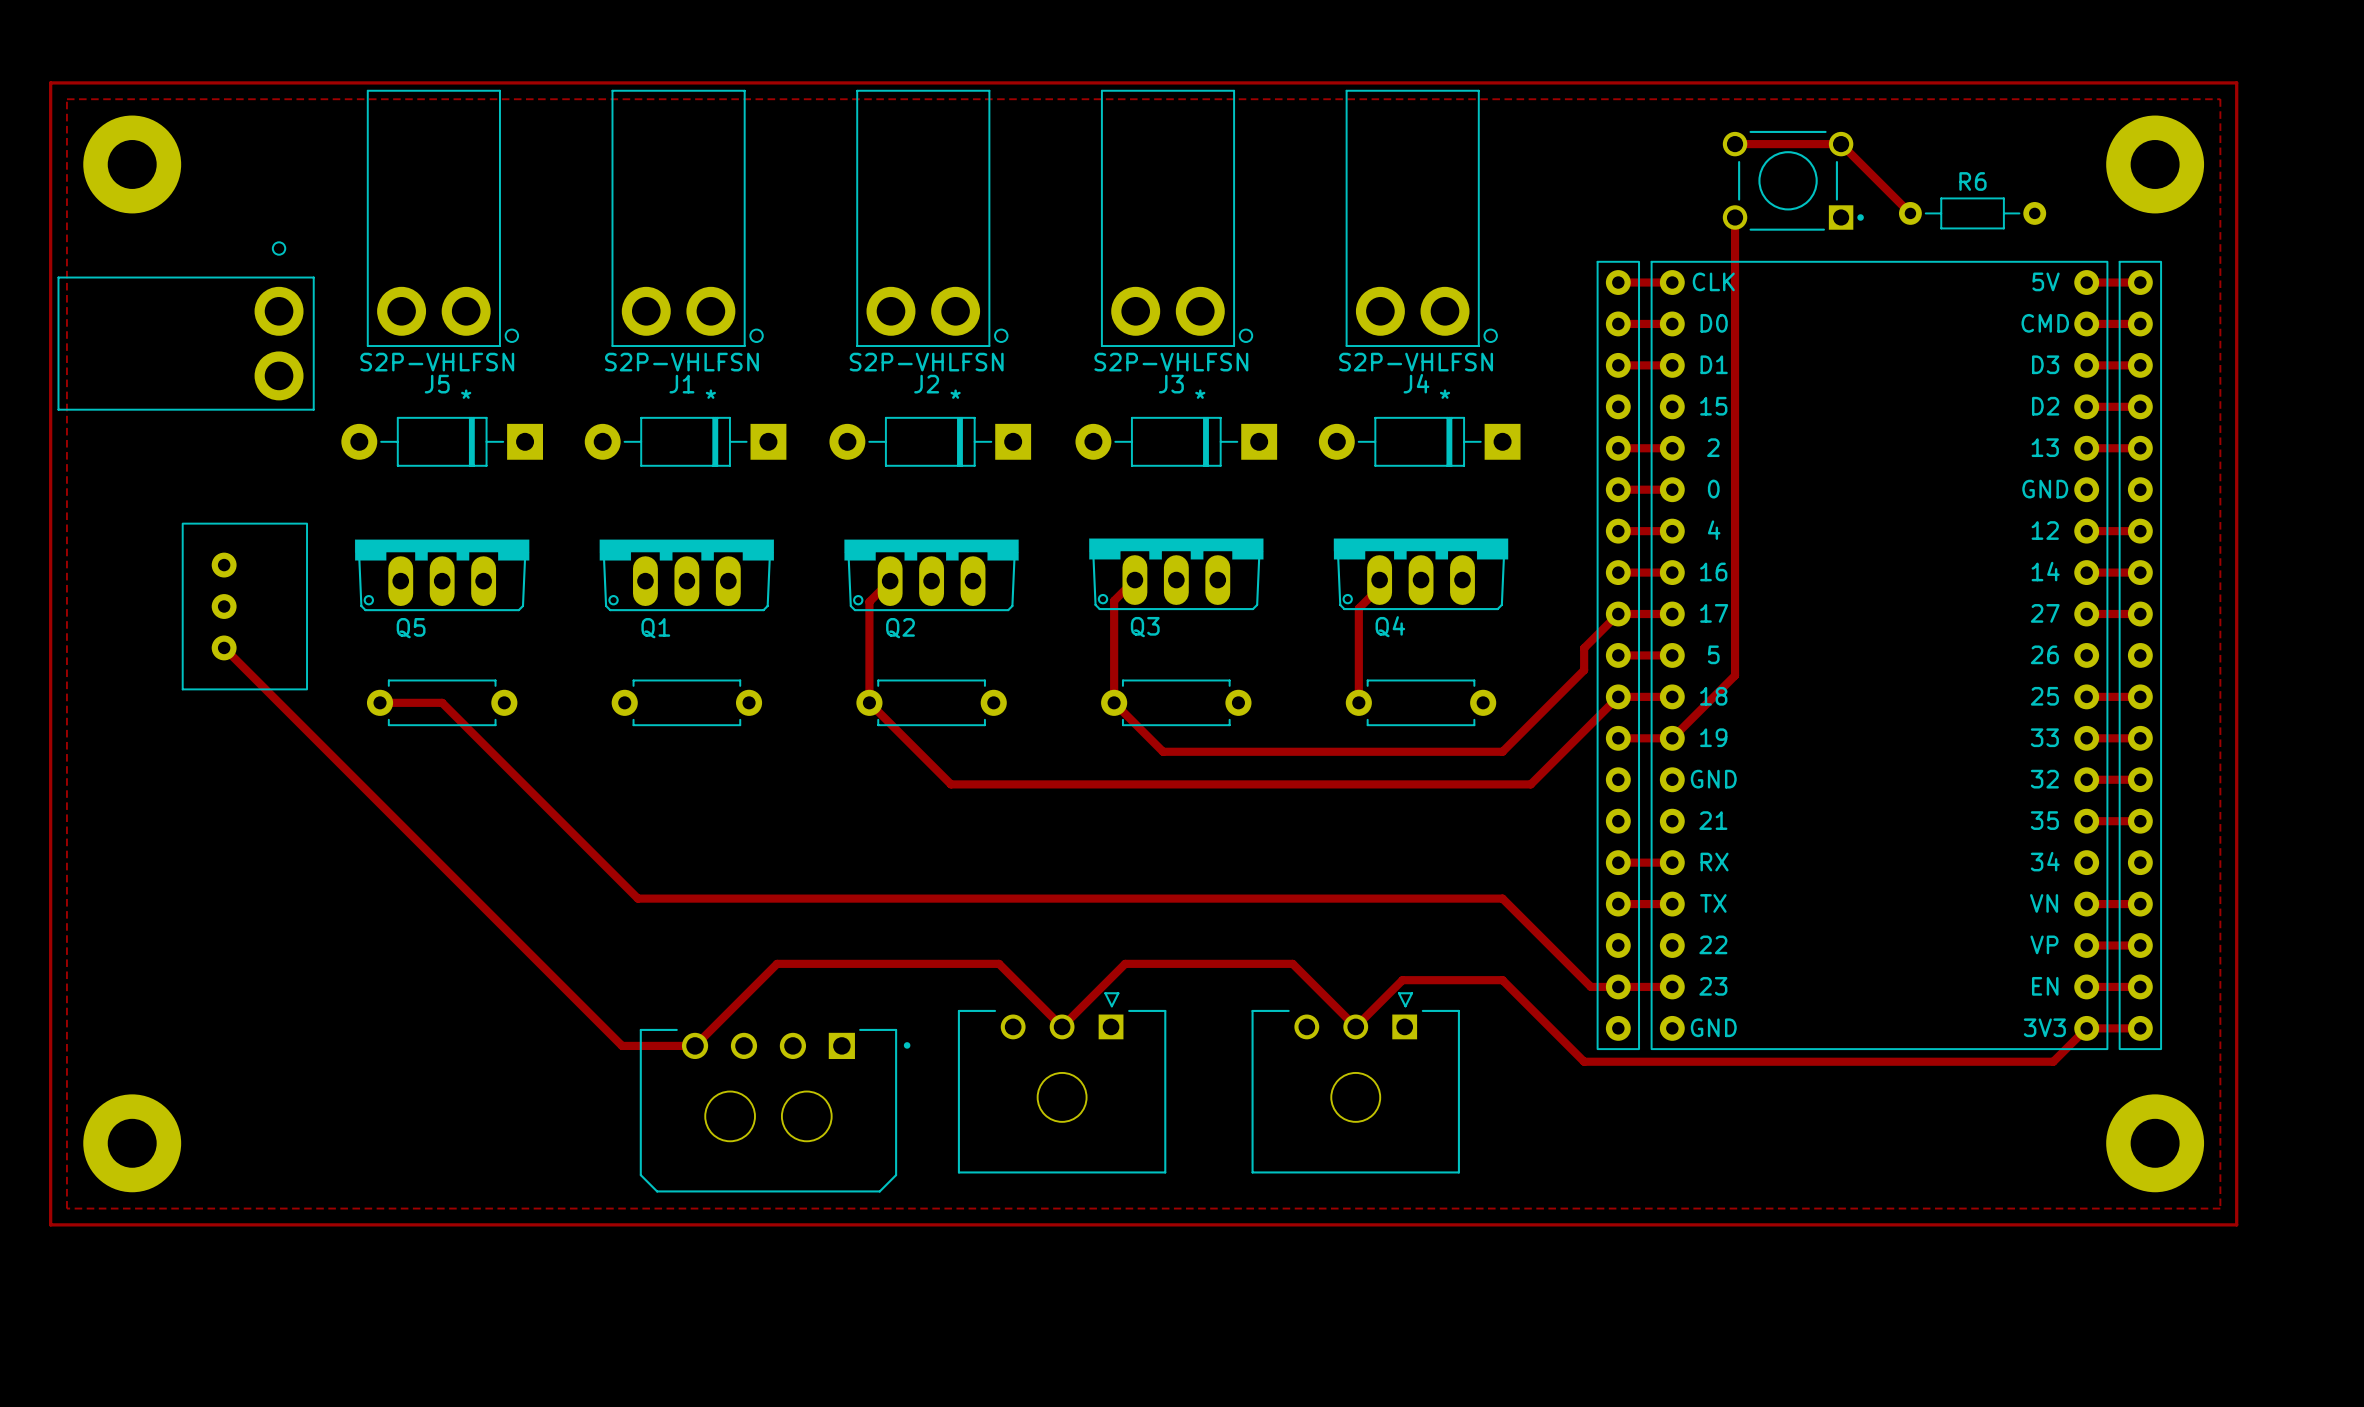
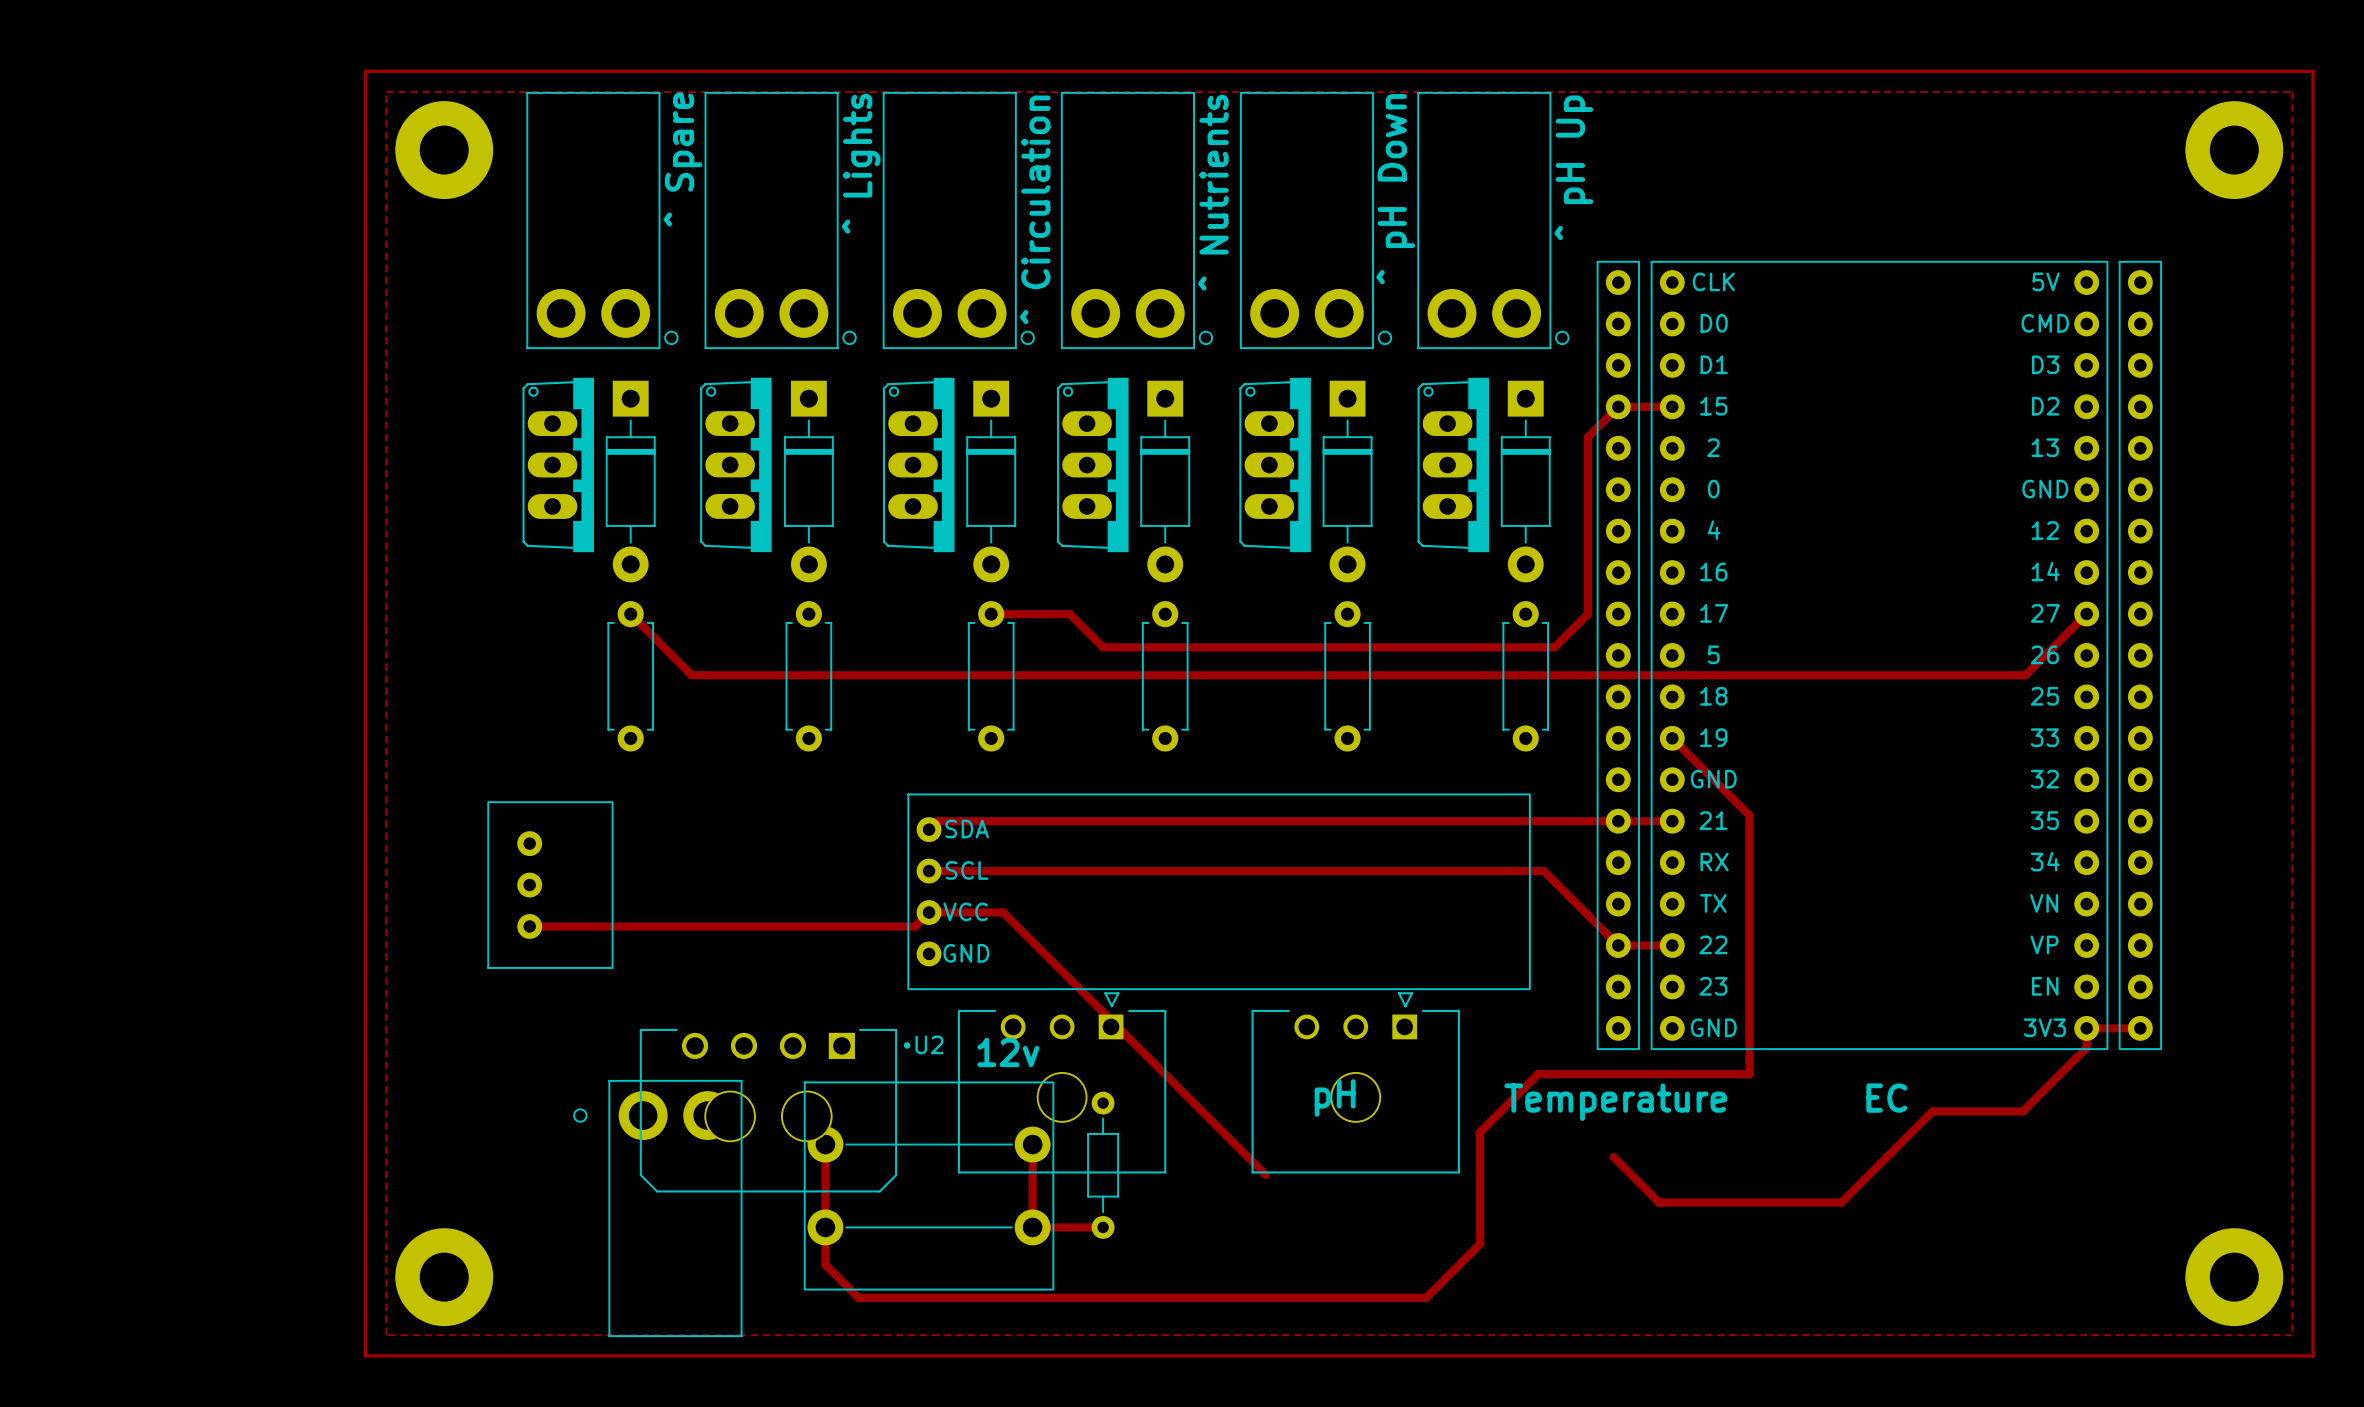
track: (50, 82) (2236, 82) (2236, 1224) (50, 1224) (50, 82) -> (365, 71) (365, 1355) (2313, 1355) (2313, 71) (365, 71)
zone outline: (66, 99) (66, 1208) (2220, 1208) (2220, 99) (66, 99) -> (386, 92) (386, 1335) (2292, 1335) (2292, 92) (386, 92)
track: (1735, 144) (1841, 144) -> none
track: (1841, 144) (1910, 213) -> none
text: none -> ^ Spare (683, 159)
text: none -> ^ Lights (861, 163)
part position: (132, 164) -> (444, 150)
part position: (2155, 164) -> (2234, 150)
text: none -> ^ pH Up (1573, 167)
part: (1793, 180) -> none
text: none -> ^ pH Down (1395, 189)
text: none -> ^ Nutrients (1213, 192)
text: none -> ^ Circulation (1035, 209)
R6: (1972, 213) -> none
track: (1735, 217) (1735, 675) (1672, 738) (1618, 738) -> none
J5: S2P-VHLFSN (442, 218) -> none
J1: S2P-VHLFSN (687, 218) -> none
J2: S2P-VHLFSN (932, 218) -> none
J3: S2P-VHLFSN (1177, 218) -> none
J4: S2P-VHLFSN (1421, 218) -> none
part: none -> (602, 220)
part: none -> (780, 220)
part: none -> (958, 220)
part: none -> (1136, 220)
part: none -> (1316, 220)
part: none -> (1493, 220)
track: (1618, 282) (1672, 282) -> none
track: (2086, 282) (2140, 282) -> none
track: (1618, 323) (1672, 323) -> none
track: (2086, 323) (2140, 323) -> none
part: (186, 326) -> none
track: (1618, 365) (1672, 365) -> none
track: (2086, 365) (2140, 365) -> none
track: none -> (1672, 406) (1618, 406) (1587, 437) (1587, 614) (1554, 647) (1103, 647) (1069, 614) (991, 614)
track: (2086, 406) (2140, 406) -> none
part: (442, 441) -> none
part: (685, 441) -> none
part: (930, 441) -> none
part rotation: 0° (1176, 441) -> 90° counterclockwise (1165, 481)
part: (1419, 441) -> none
track: (1618, 448) (1672, 448) -> none
track: (2086, 448) (2140, 448) -> none
part: none -> (558, 464)
part: none -> (735, 464)
part: none -> (918, 464)
part: none -> (1092, 464)
part: none -> (1275, 464)
part: none -> (1453, 464)
part: none -> (630, 481)
part: none -> (808, 481)
part: none -> (991, 481)
part: none -> (1347, 481)
part: none -> (1525, 481)
track: (1618, 489) (1672, 489) -> none
track: (1618, 531) (1672, 531) -> none
track: (2086, 531) (2140, 531) -> none
track: (1613, 572) (1672, 572) -> none
track: (2086, 572) (2140, 572) -> none
Q3: (1176, 574) -> none
Q4: (1421, 574) -> none
Q5: (442, 575) -> none
Q1: (686, 575) -> none
Q2: (931, 575) -> none
track: (1134, 580) (1114, 600) (1114, 702) (1163, 751) (1502, 751) (1584, 670) (1584, 648) (1618, 614) (1672, 614) -> none
track: (890, 581) (869, 601) (869, 702) (951, 784) (1530, 784) (1618, 696) (1672, 696) -> none
track: (1379, 587) (1358, 608) (1358, 702) -> none
part: (244, 606) -> none
track: (2086, 614) (2140, 614) -> (2086, 614) (2025, 675) (691, 675) (630, 614)
track: (224, 647) (622, 1045) (695, 1045) (777, 963) (999, 963) (1062, 1026) (1125, 963) (1292, 963) (1355, 1026) (1402, 980) (1502, 980) (1584, 1061) (2053, 1061) (2086, 1028) -> (1613, 1156) (1659, 1202) (1841, 1202) (1932, 1111) (2022, 1111) (2086, 1047) (2086, 1028)
track: (1618, 655) (1672, 655) -> none
part: none -> (808, 676)
part: none -> (991, 676)
part: none -> (1347, 676)
part: none -> (1525, 676)
track: (2086, 696) (2140, 696) -> none
track: (380, 702) (442, 702) (637, 898) (1502, 898) (1590, 986) (1672, 986) -> none
part: (442, 702) -> none
part rotation: 0° (686, 702) -> 90° clockwise (630, 676)
part: (931, 702) -> none
part rotation: 0° (1176, 702) -> 90° clockwise (1165, 676)
part: (1421, 702) -> none
track: none -> (1672, 738) (1749, 815) (1749, 1074) (1538, 1074) (1480, 1132) (1480, 1244) (1426, 1297) (858, 1297) (825, 1264) (825, 1144)
track: (2086, 738) (2140, 738) -> none
track: (2086, 779) (2140, 779) -> none
track: none -> (1672, 821) (937, 821) (929, 829)
track: (2086, 821) (2140, 821) -> none
track: (1618, 862) (1672, 862) -> none
track: none -> (929, 871) (1543, 871) (1618, 945) (1672, 945)
part: none -> (550, 885)
part: none -> (1219, 891)
track: (1618, 904) (1672, 904) -> none
track: (2086, 904) (2140, 904) -> none
track: none -> (529, 926) (915, 926) (929, 912) (1003, 912) (1265, 1175)
track: (2086, 945) (2140, 945) -> none
track: (2086, 986) (2140, 986) -> none
text: none -> 12v (1008, 1052)
text: none -> pH (1335, 1097)
text: none -> EC (1886, 1098)
text: none -> Temperature (1615, 1102)
part position: (132, 1143) -> (444, 1277)
part position: (2155, 1143) -> (2234, 1277)
track: none -> (1032, 1144) (1032, 1227) (1103, 1227)
part: none -> (1103, 1165)
U2: none -> (929, 1185)
part: none -> (657, 1208)

